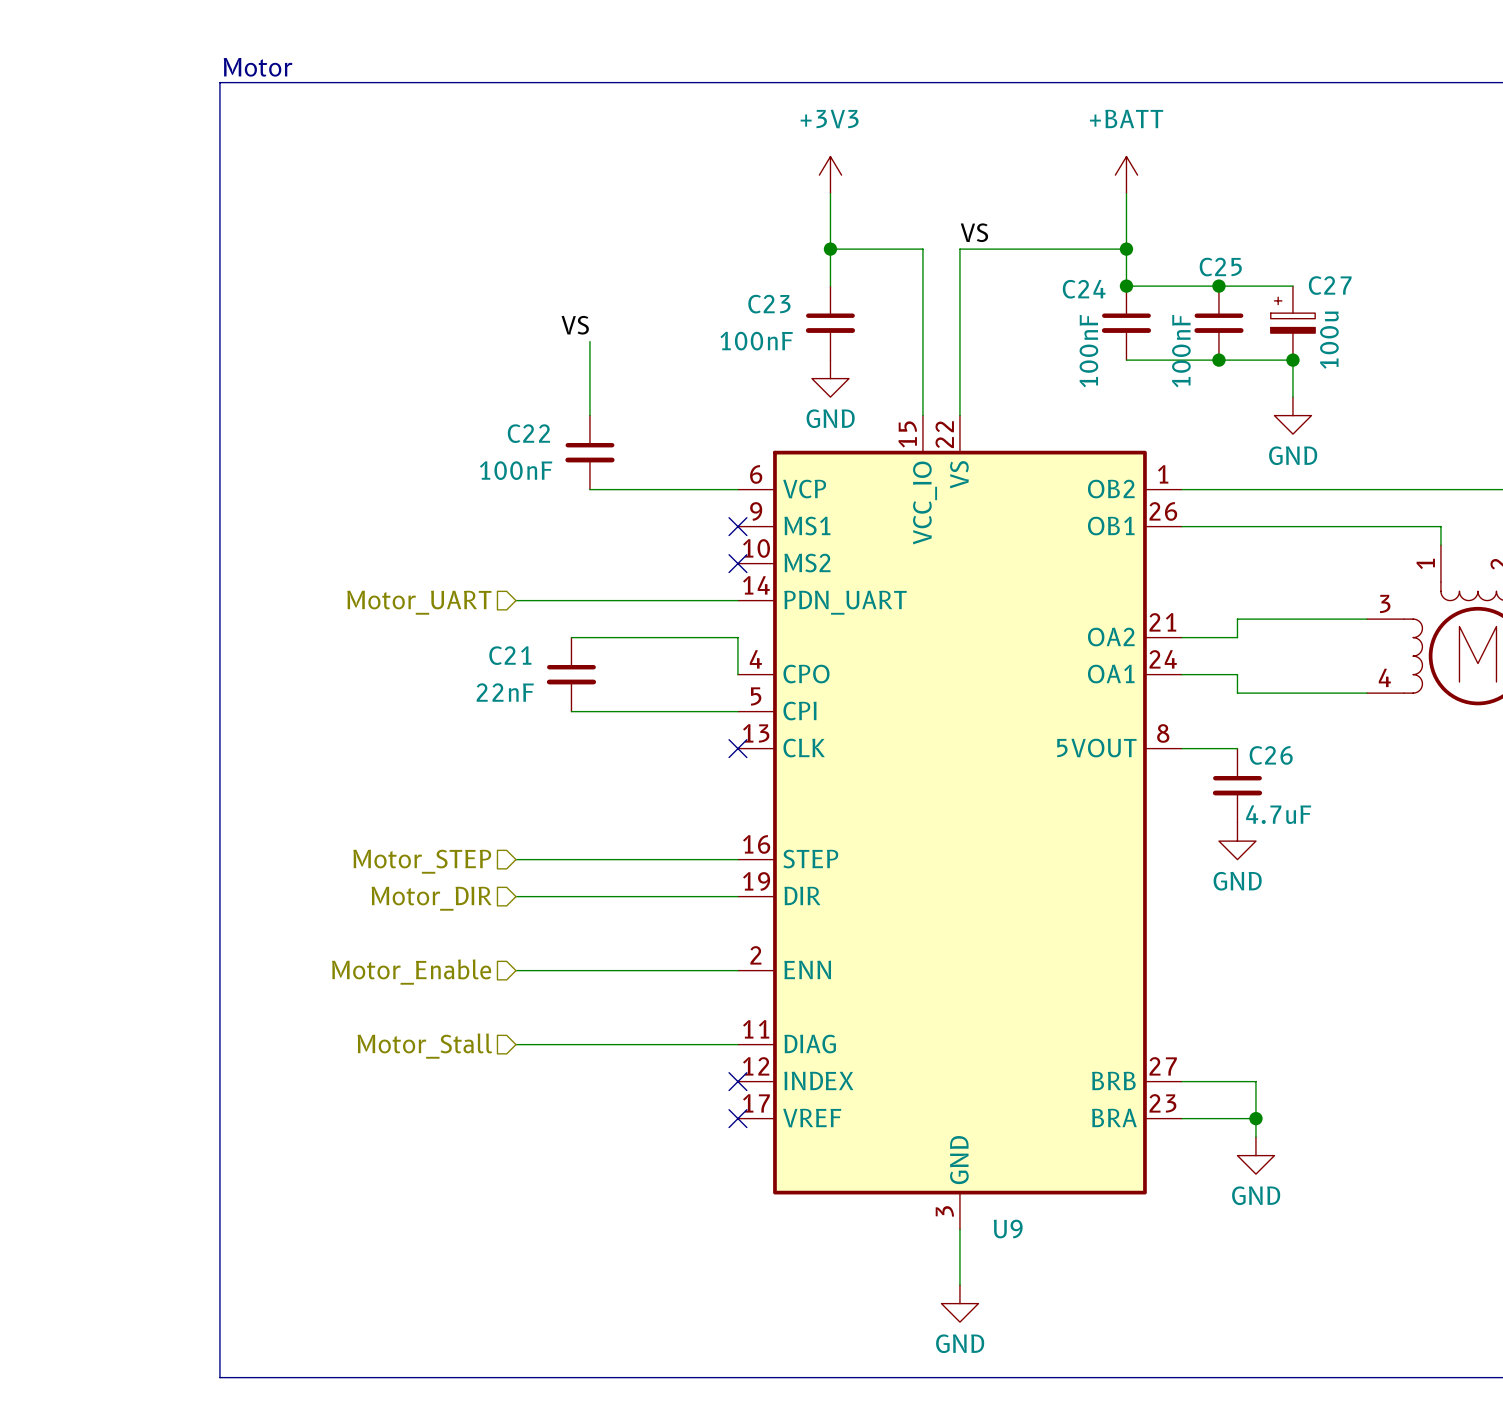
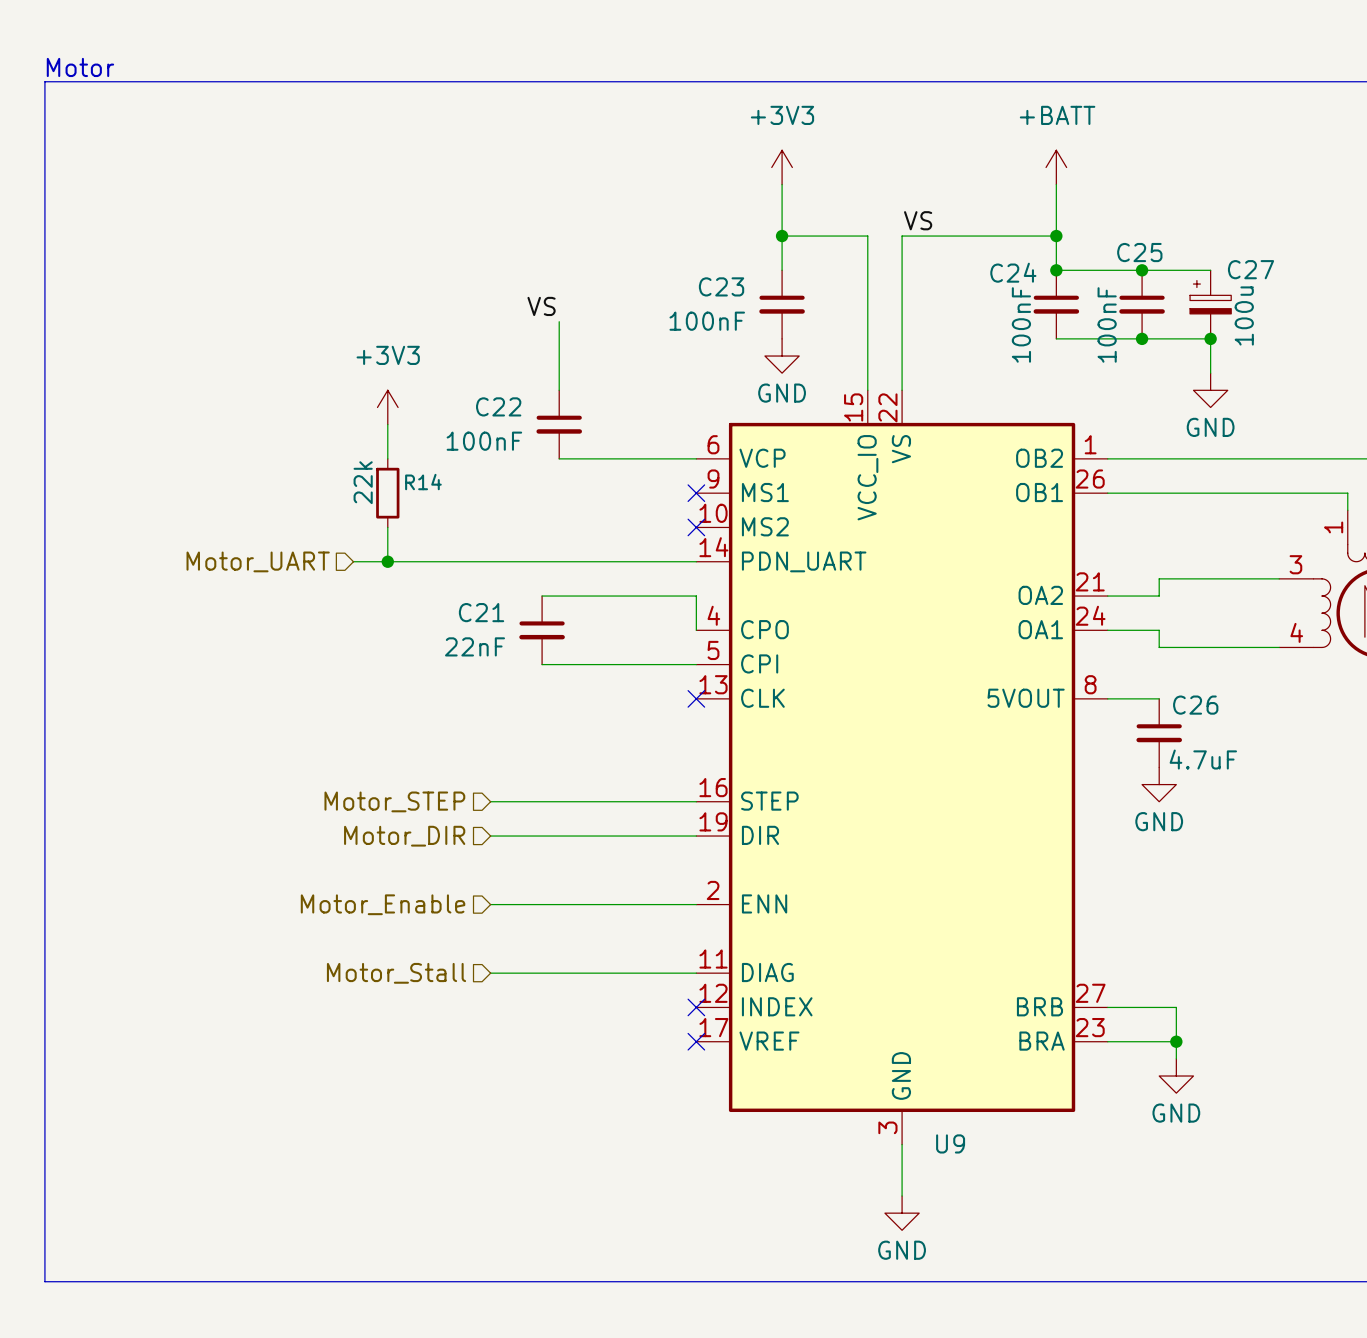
text position: Motor (258, 67) -> Motor (80, 67)
line: (219, 82) (219, 1377) -> (216, 81) (44, 81) (44, 1281) (216, 1281)
power symbol: none -> +3V3 (387, 407)
wire: none -> (387, 424) (387, 458)
R14: none -> 22k (387, 493)
wire: none -> (387, 527) (387, 561)
wire: none -> (353, 561) (490, 561)
junction: none -> (387, 561)
hierarchical label position: Motor_UART (419, 602) -> Motor_UART (258, 561)

